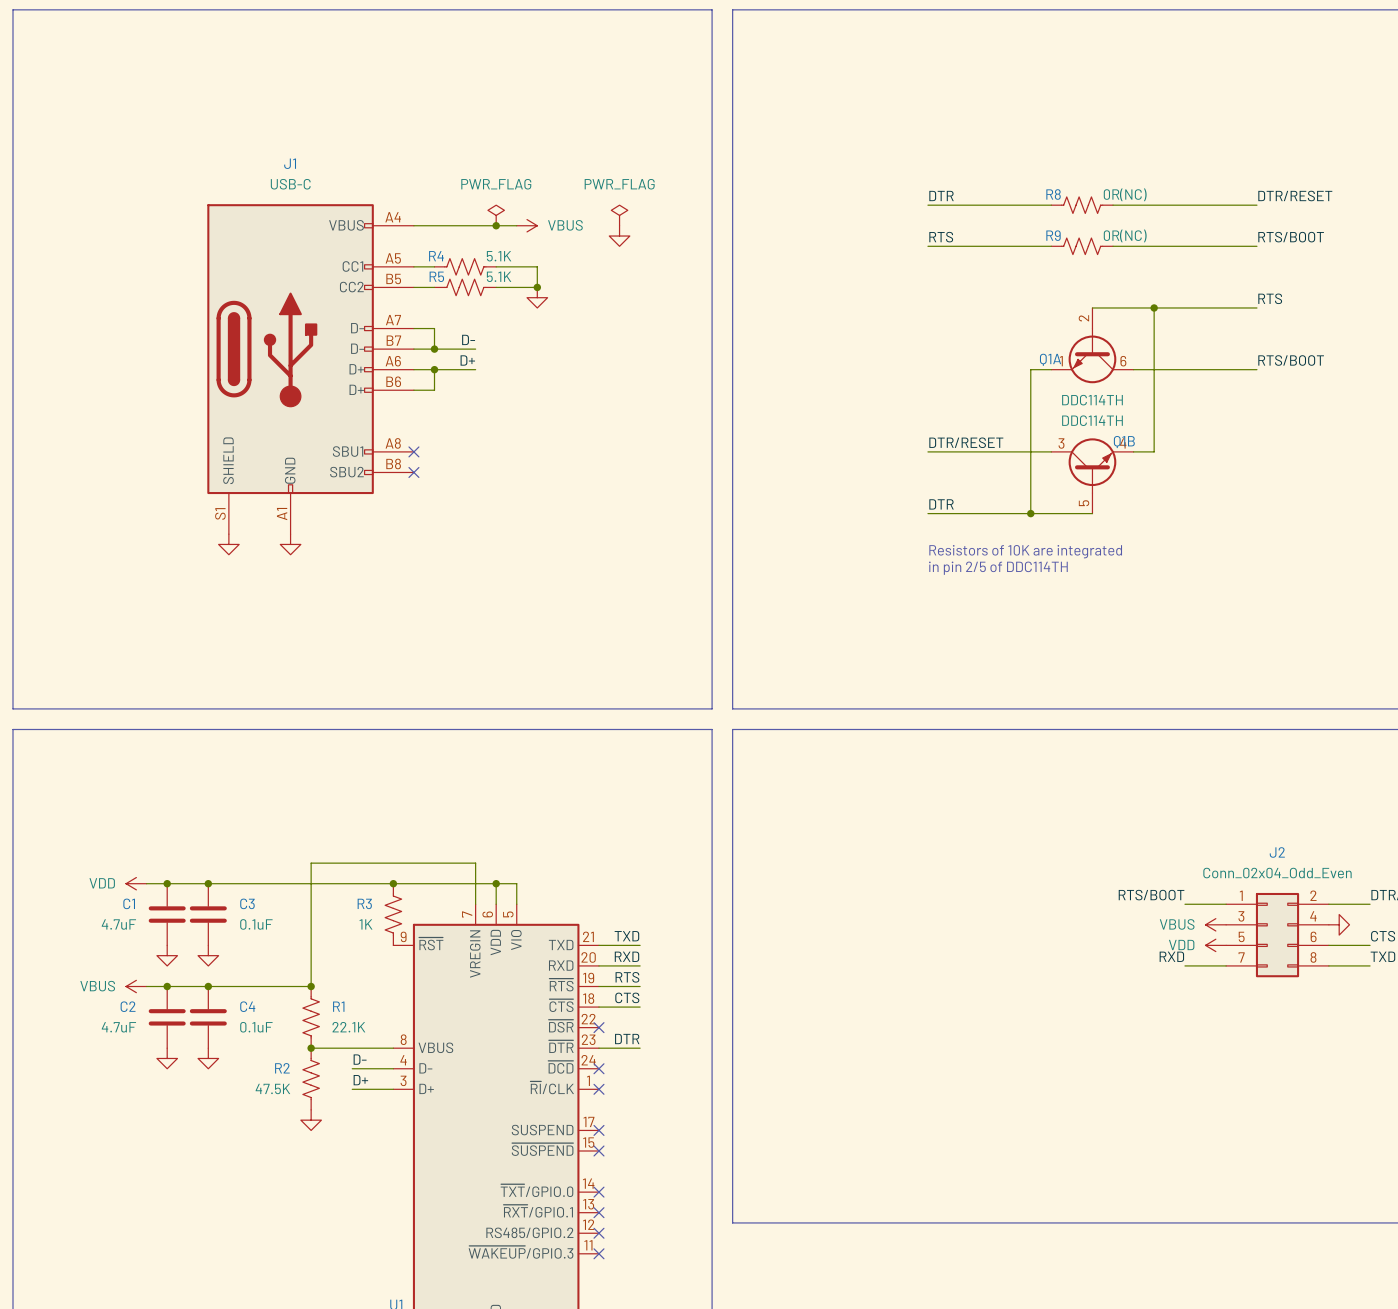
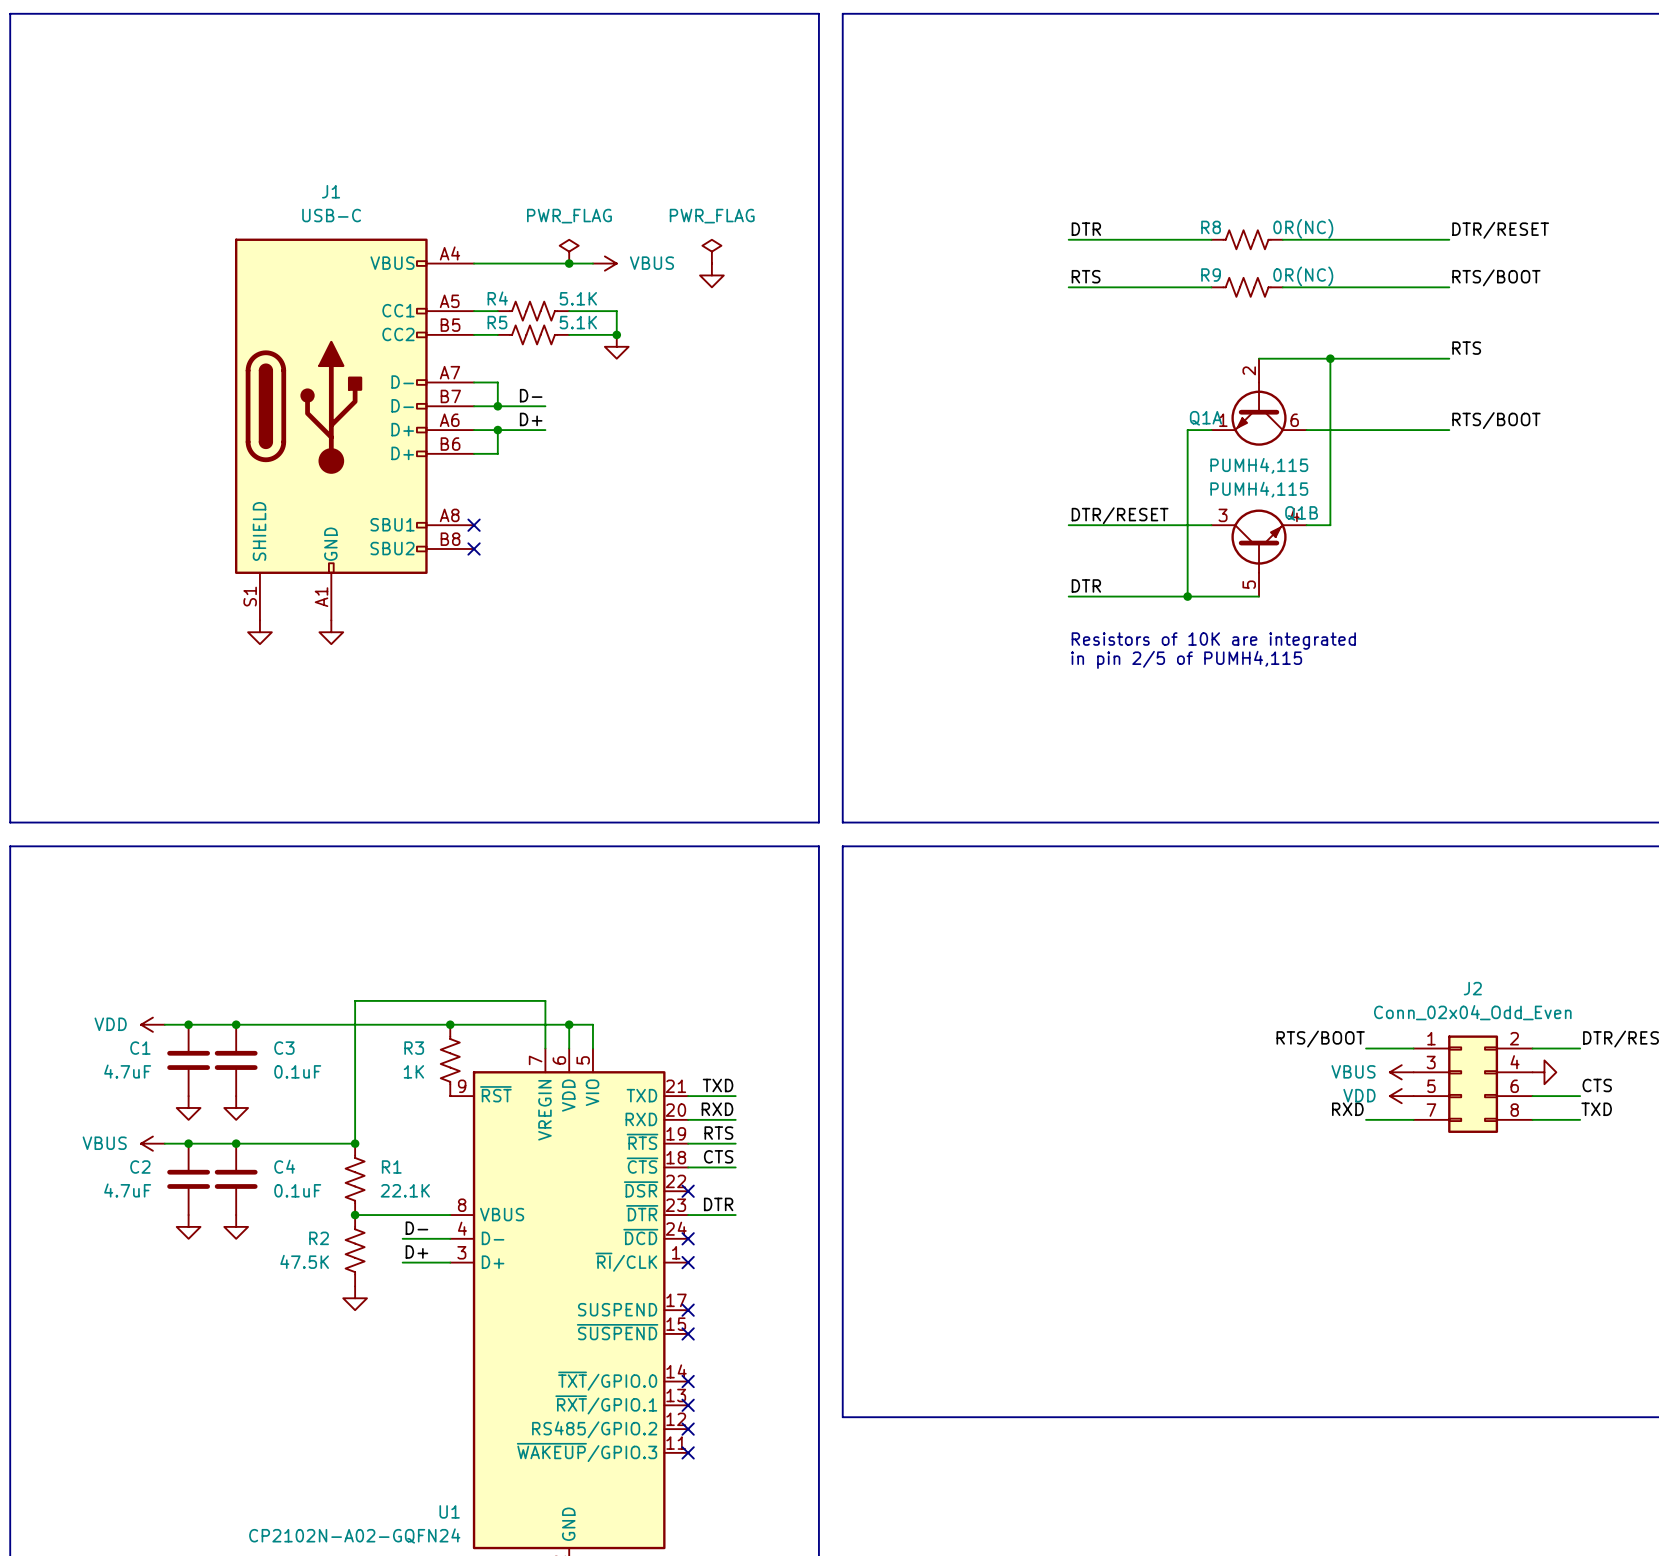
Q1A value: DDC114TH (1092, 400) -> PUMH4,115 (1259, 465)
Q1B value: DDC114TH (1092, 420) -> PUMH4,115 (1259, 489)
text: in pin 2/5 of DDC114TH (998, 568) -> in pin 2/5 of PUMH4,115 (1186, 659)

